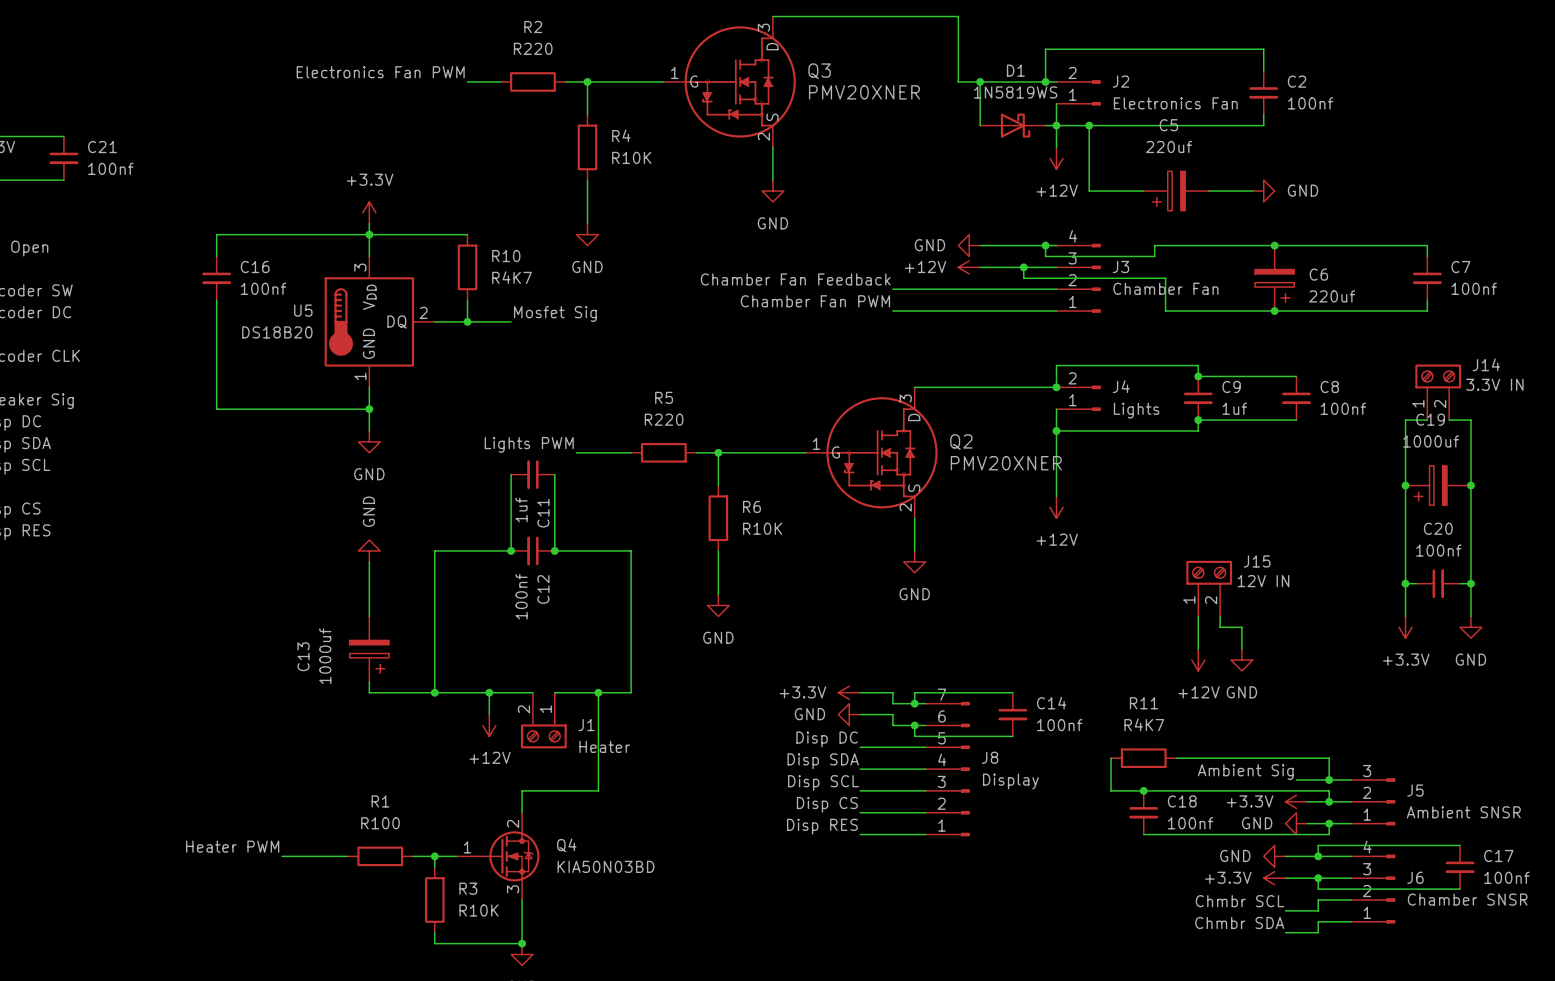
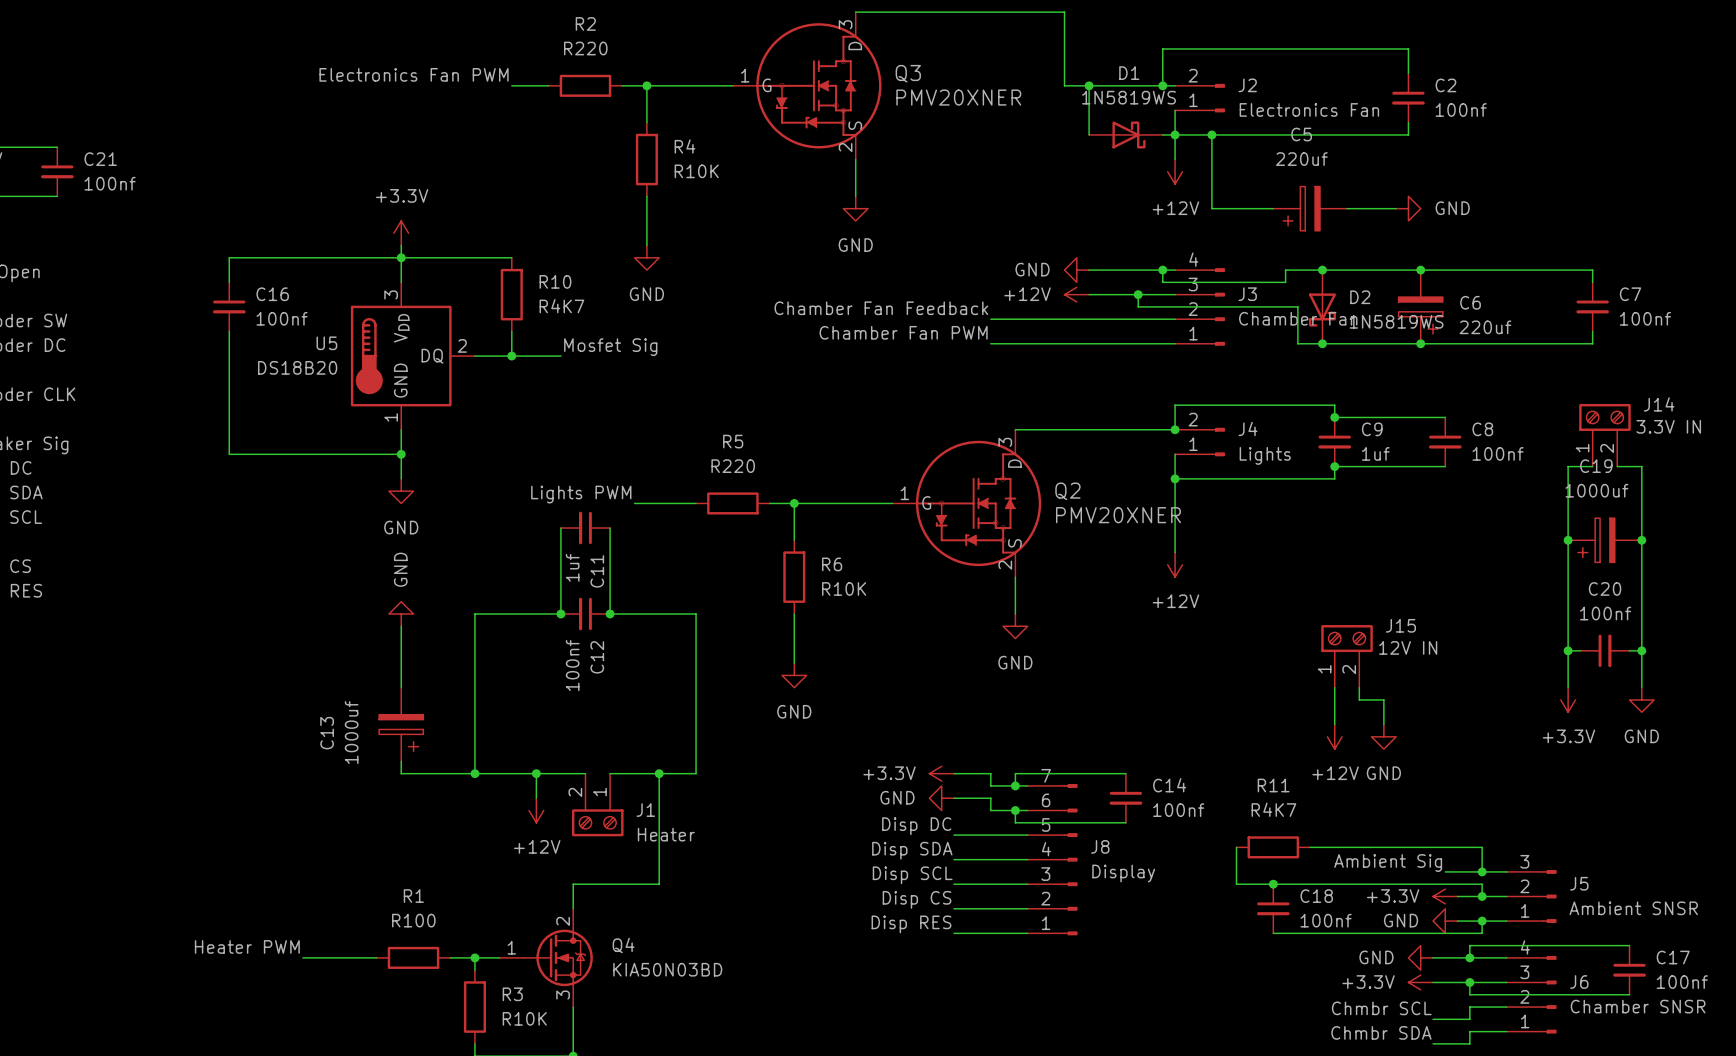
junction: none -> (1322, 270)
D2: none -> 1N5819WS (1322, 306)
junction: none -> (1322, 343)

